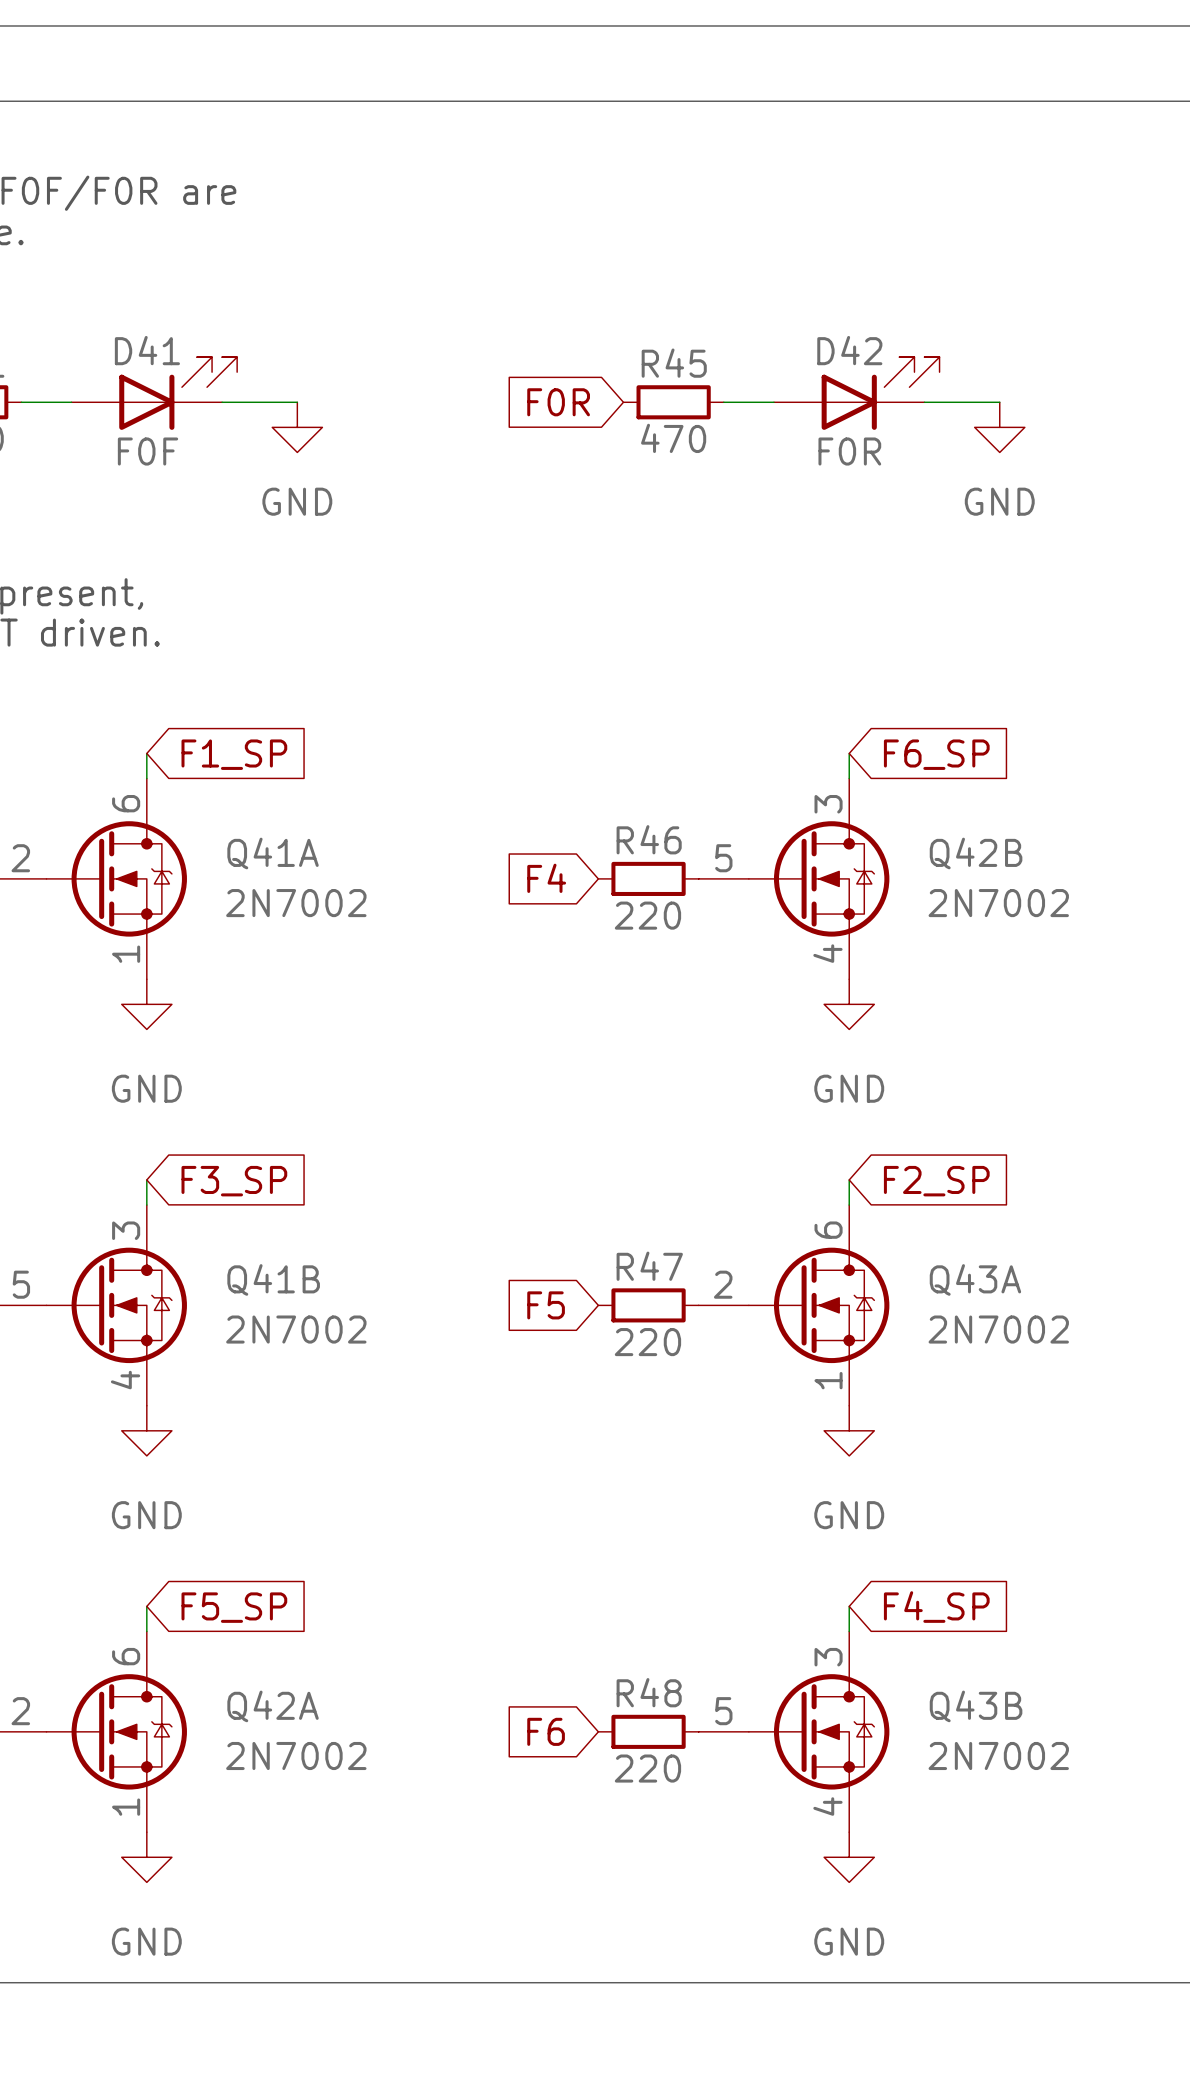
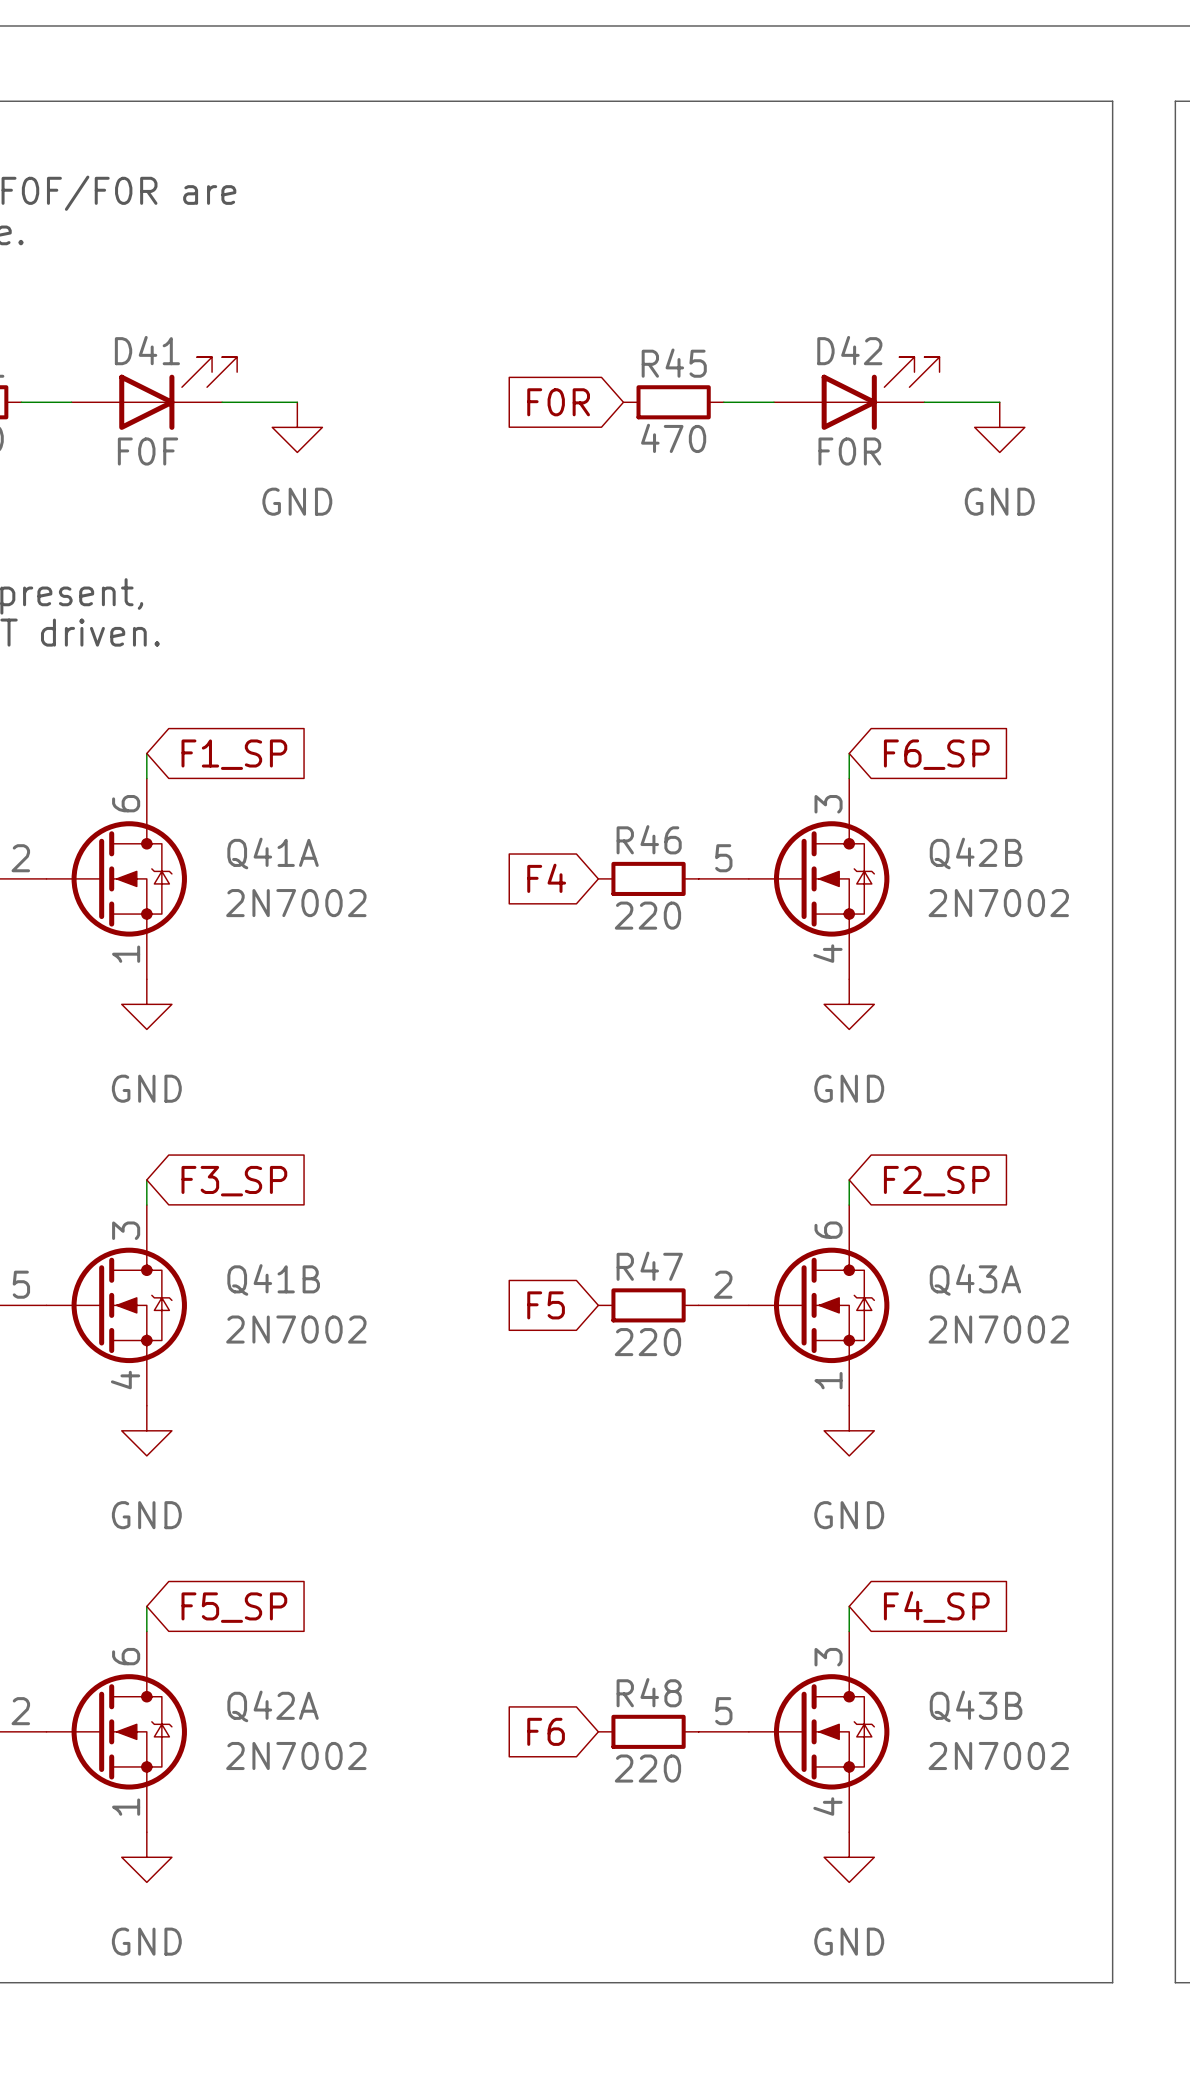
line: (1112, 101) (1175, 101) -> (1112, 101) (1112, 1982)
line: (1112, 1982) (1175, 1982) -> (1175, 101) (1175, 1982)

